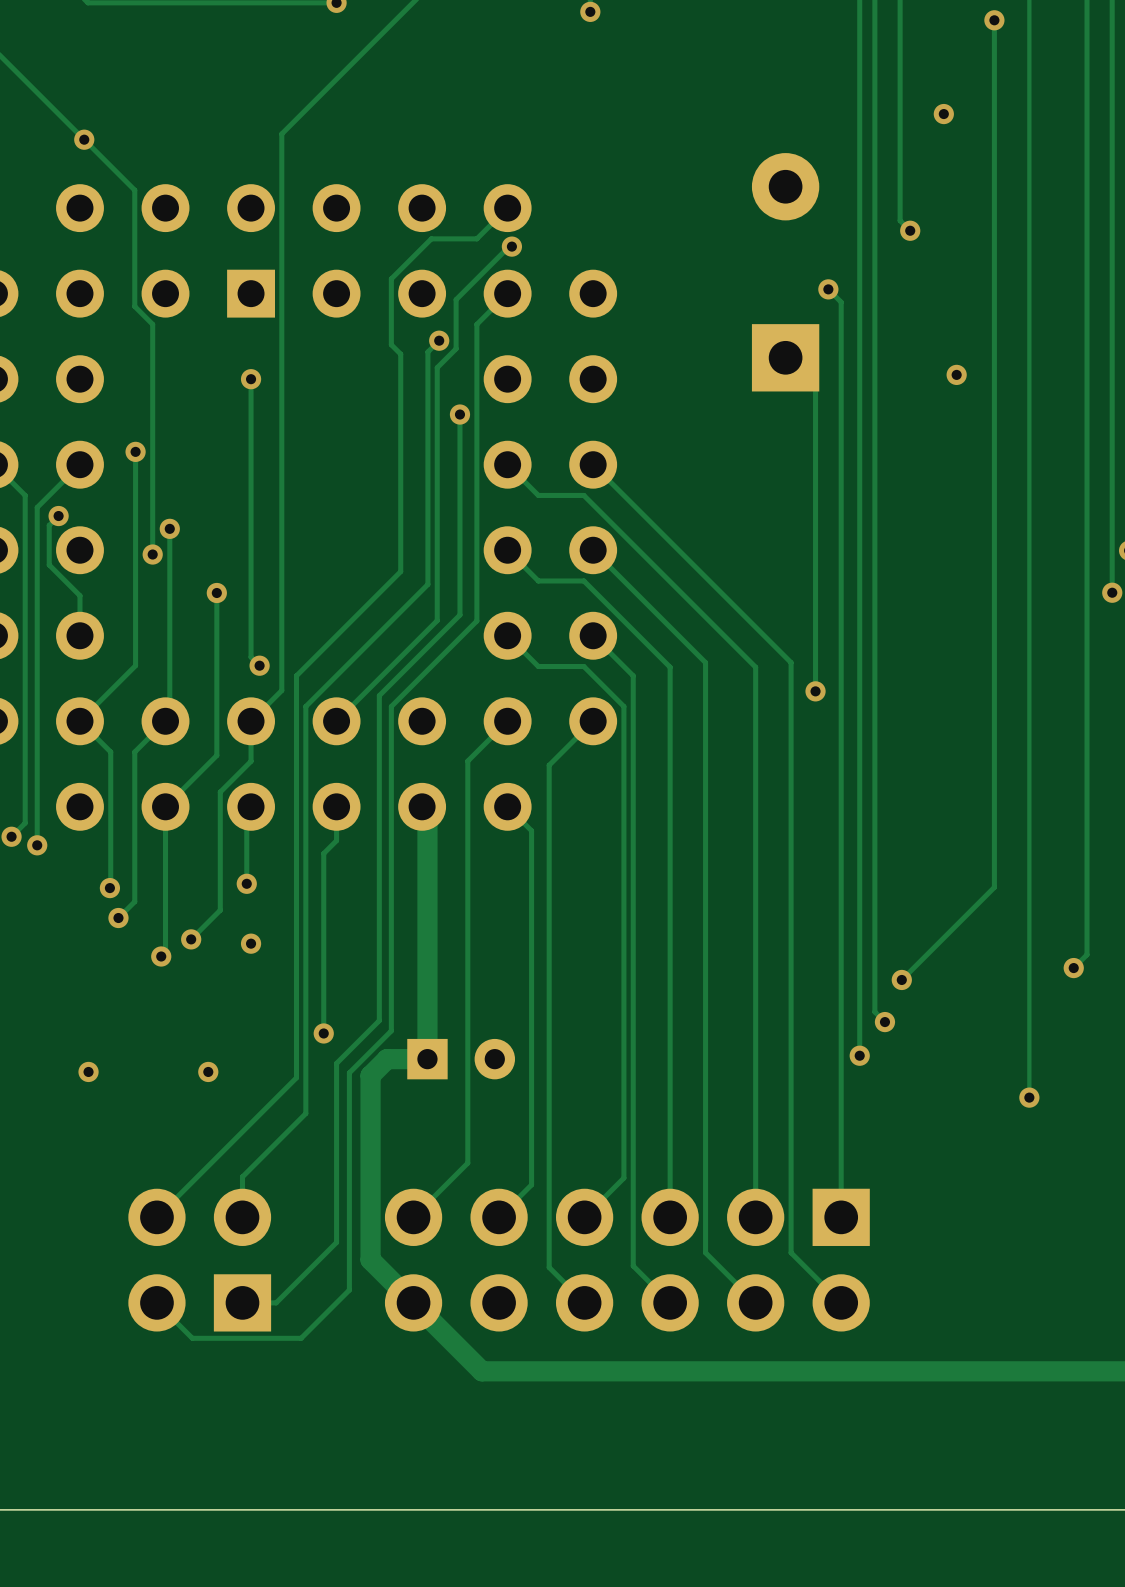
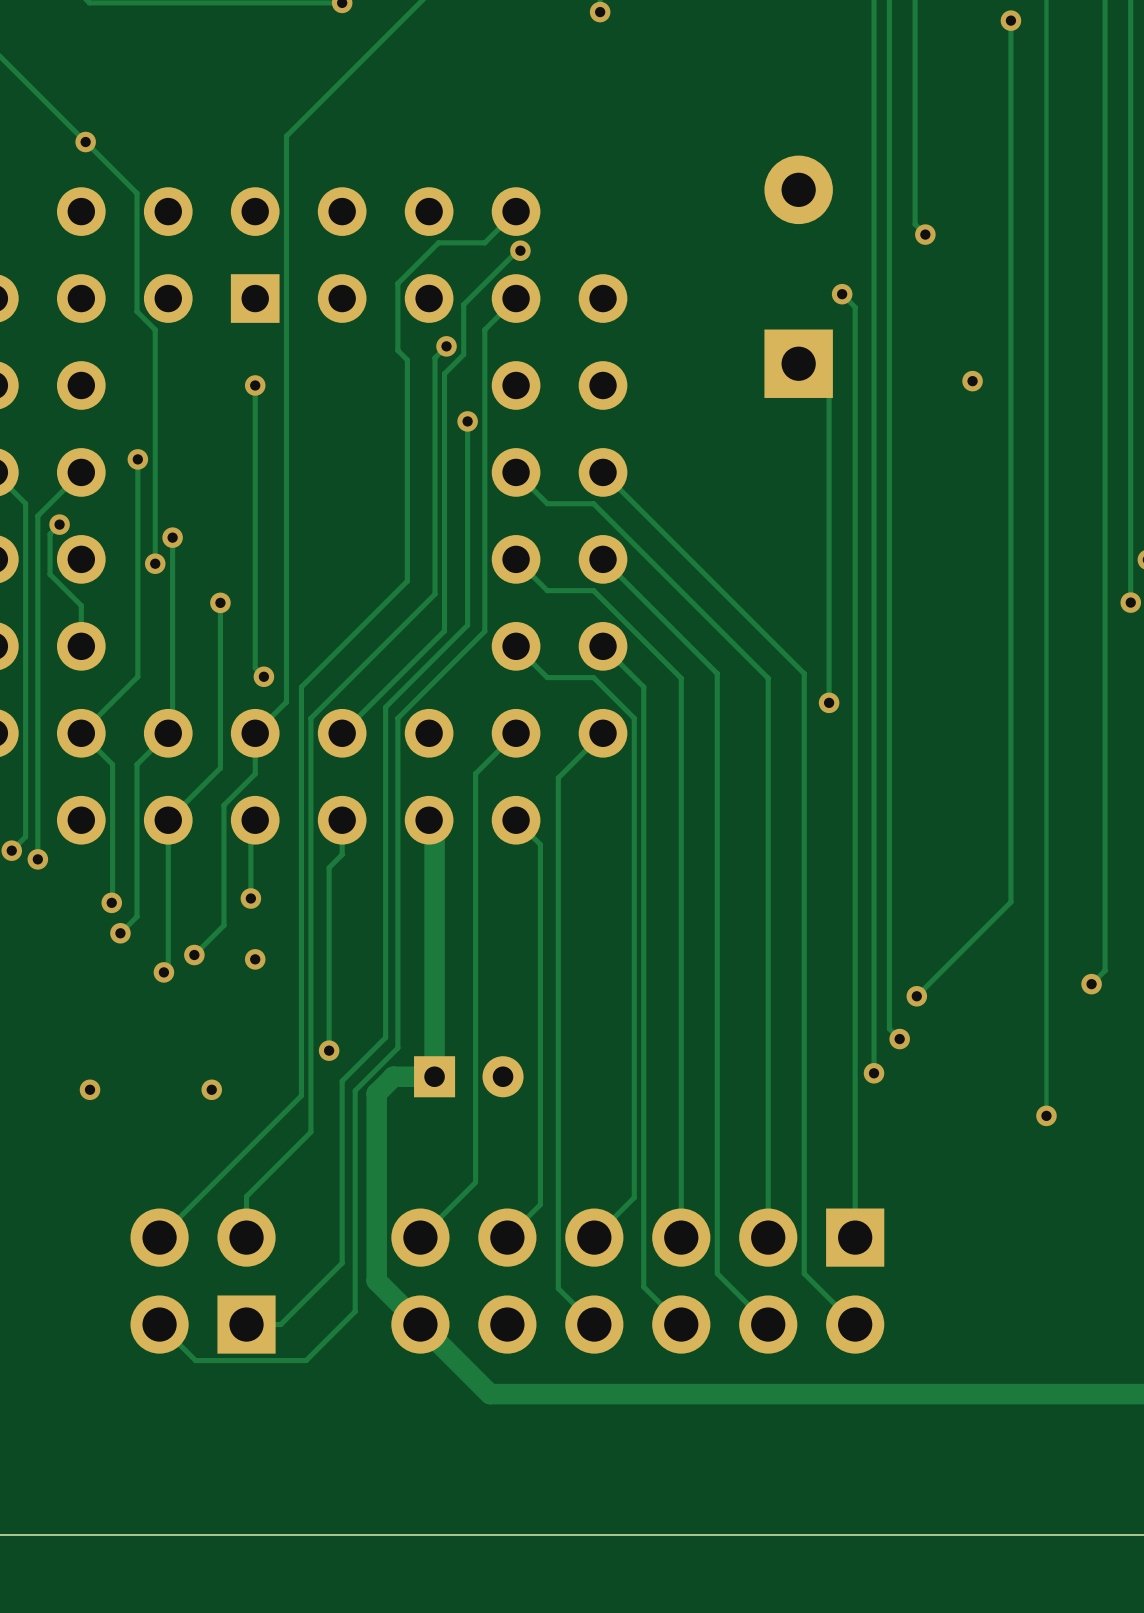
via: (943, 114) -> none

